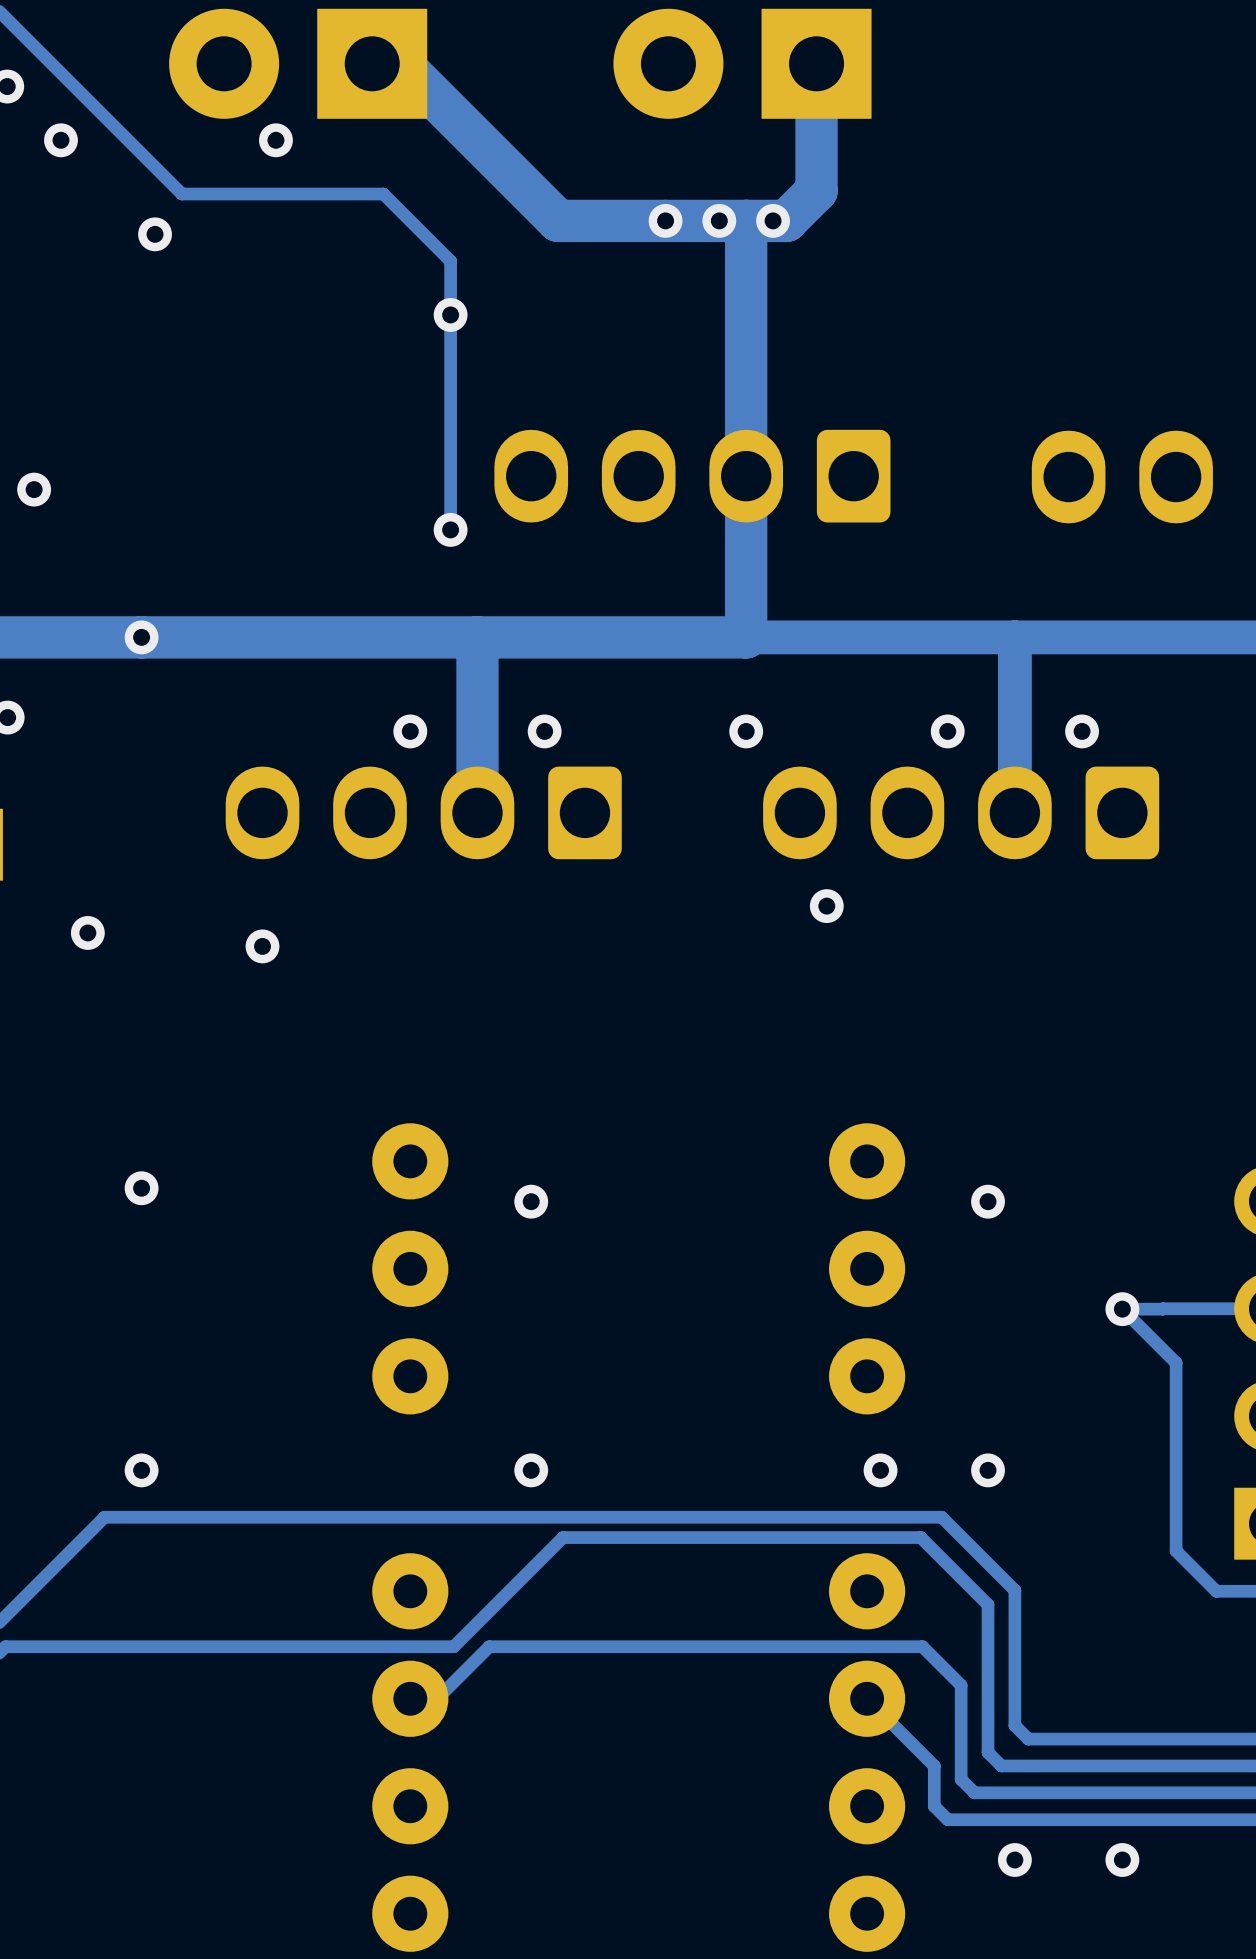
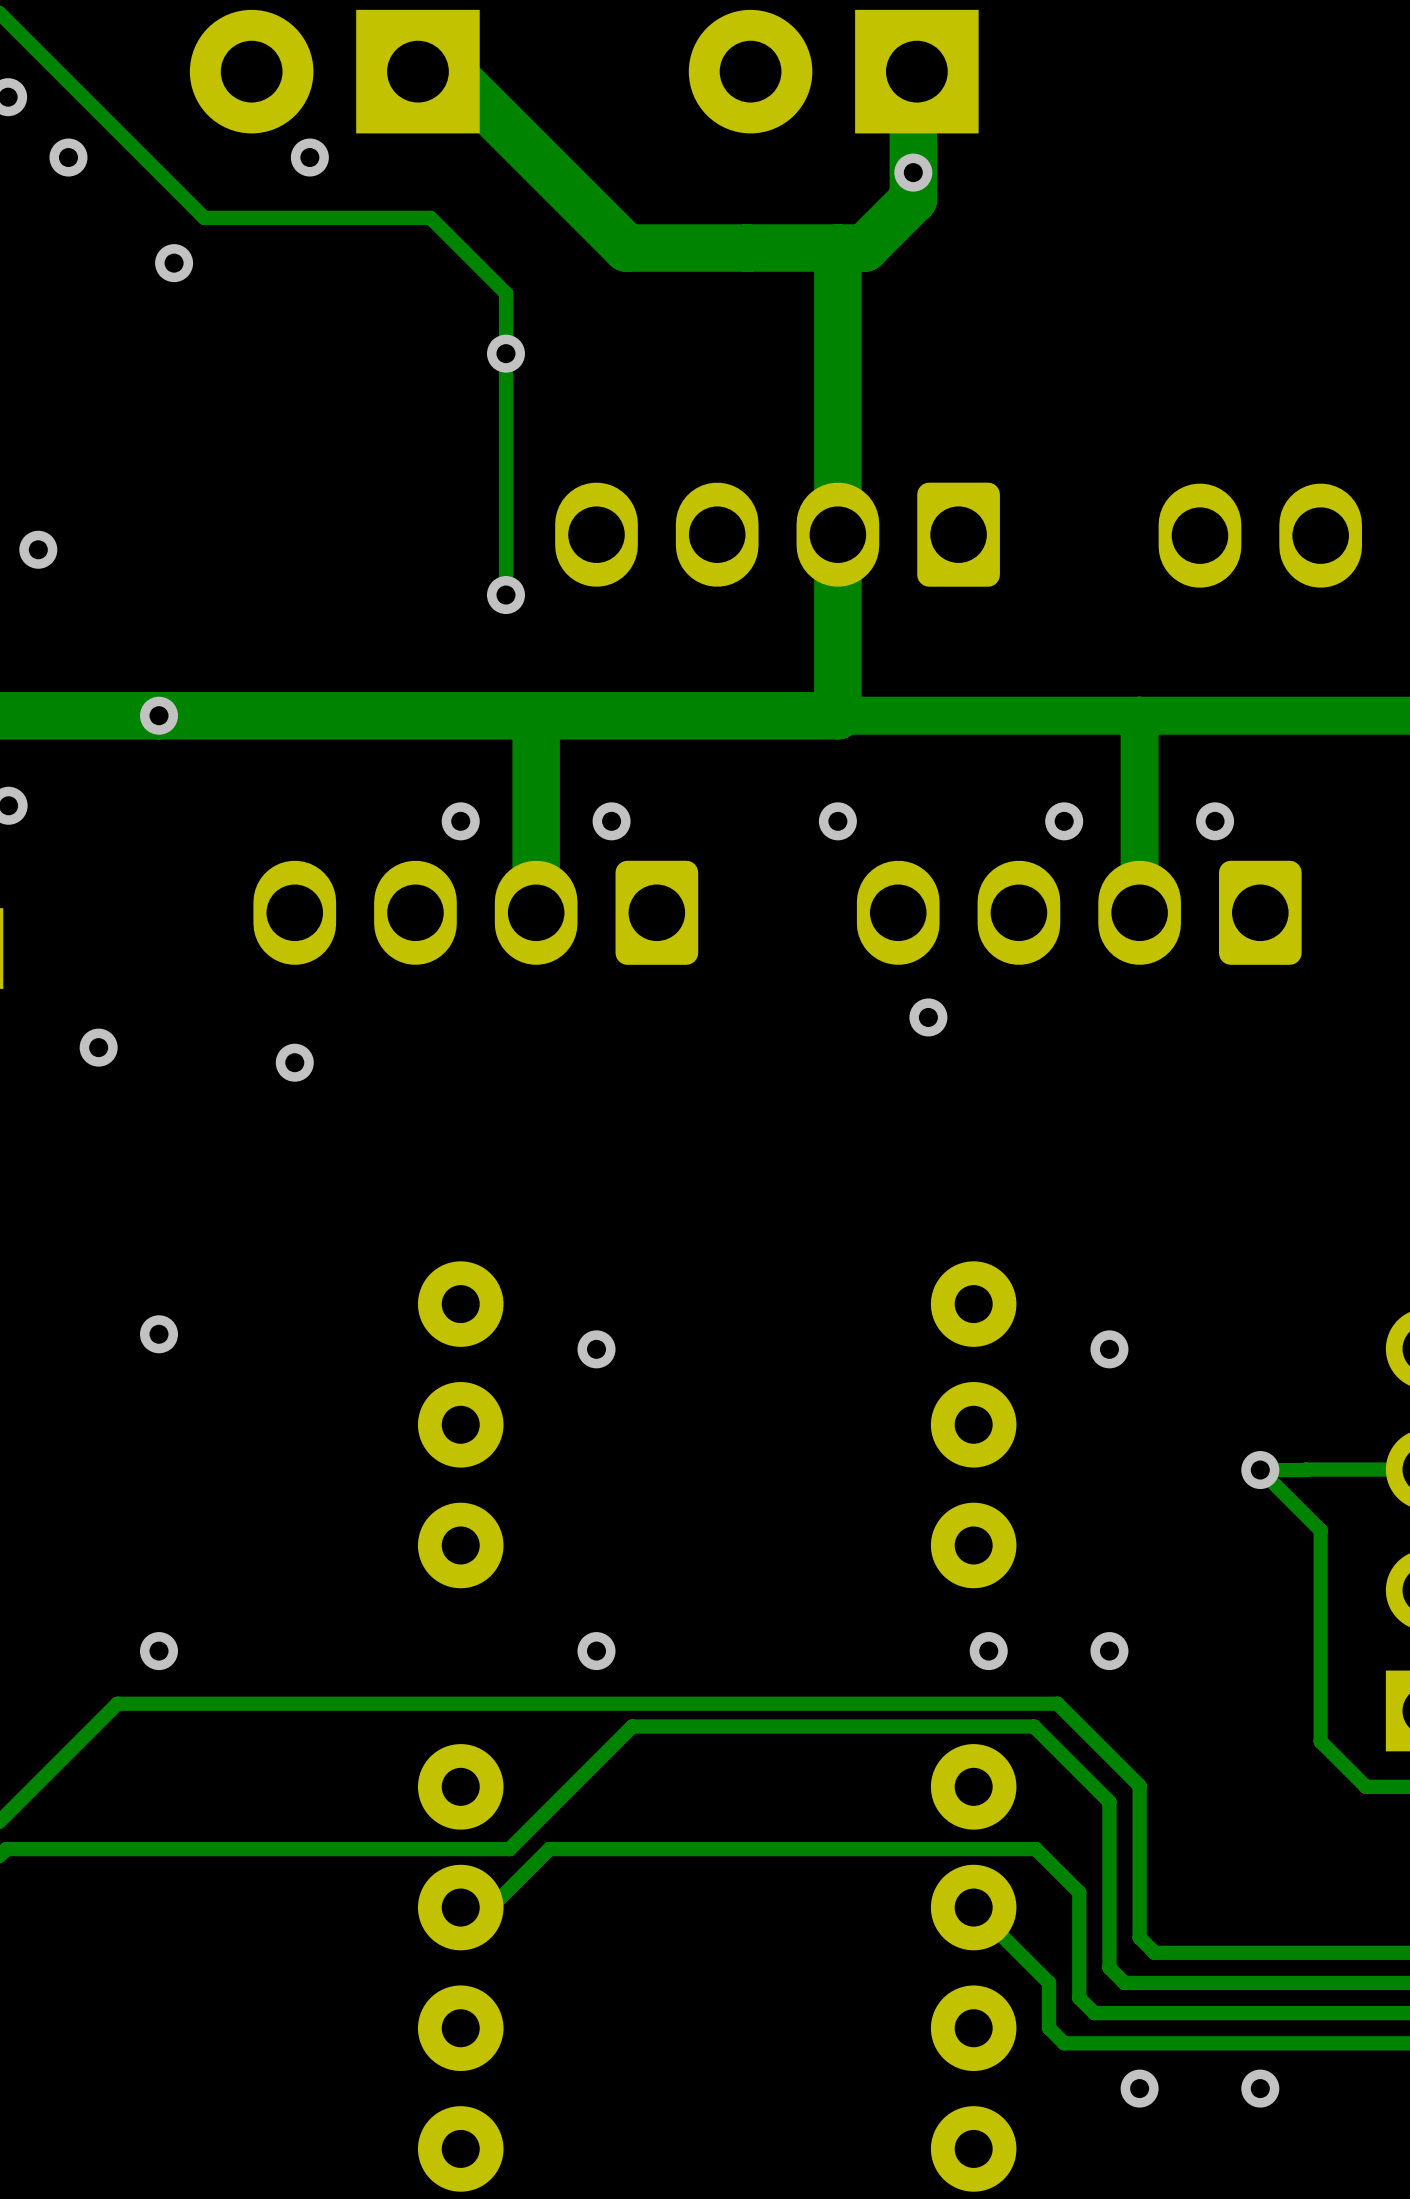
track: (816, 63) (816, 190) (786, 220) (769, 220) -> (913, 127) (913, 199) (864, 248)
via: none -> (913, 172)
via: (665, 220) -> none
via: (719, 220) -> none
via: (773, 220) -> none

